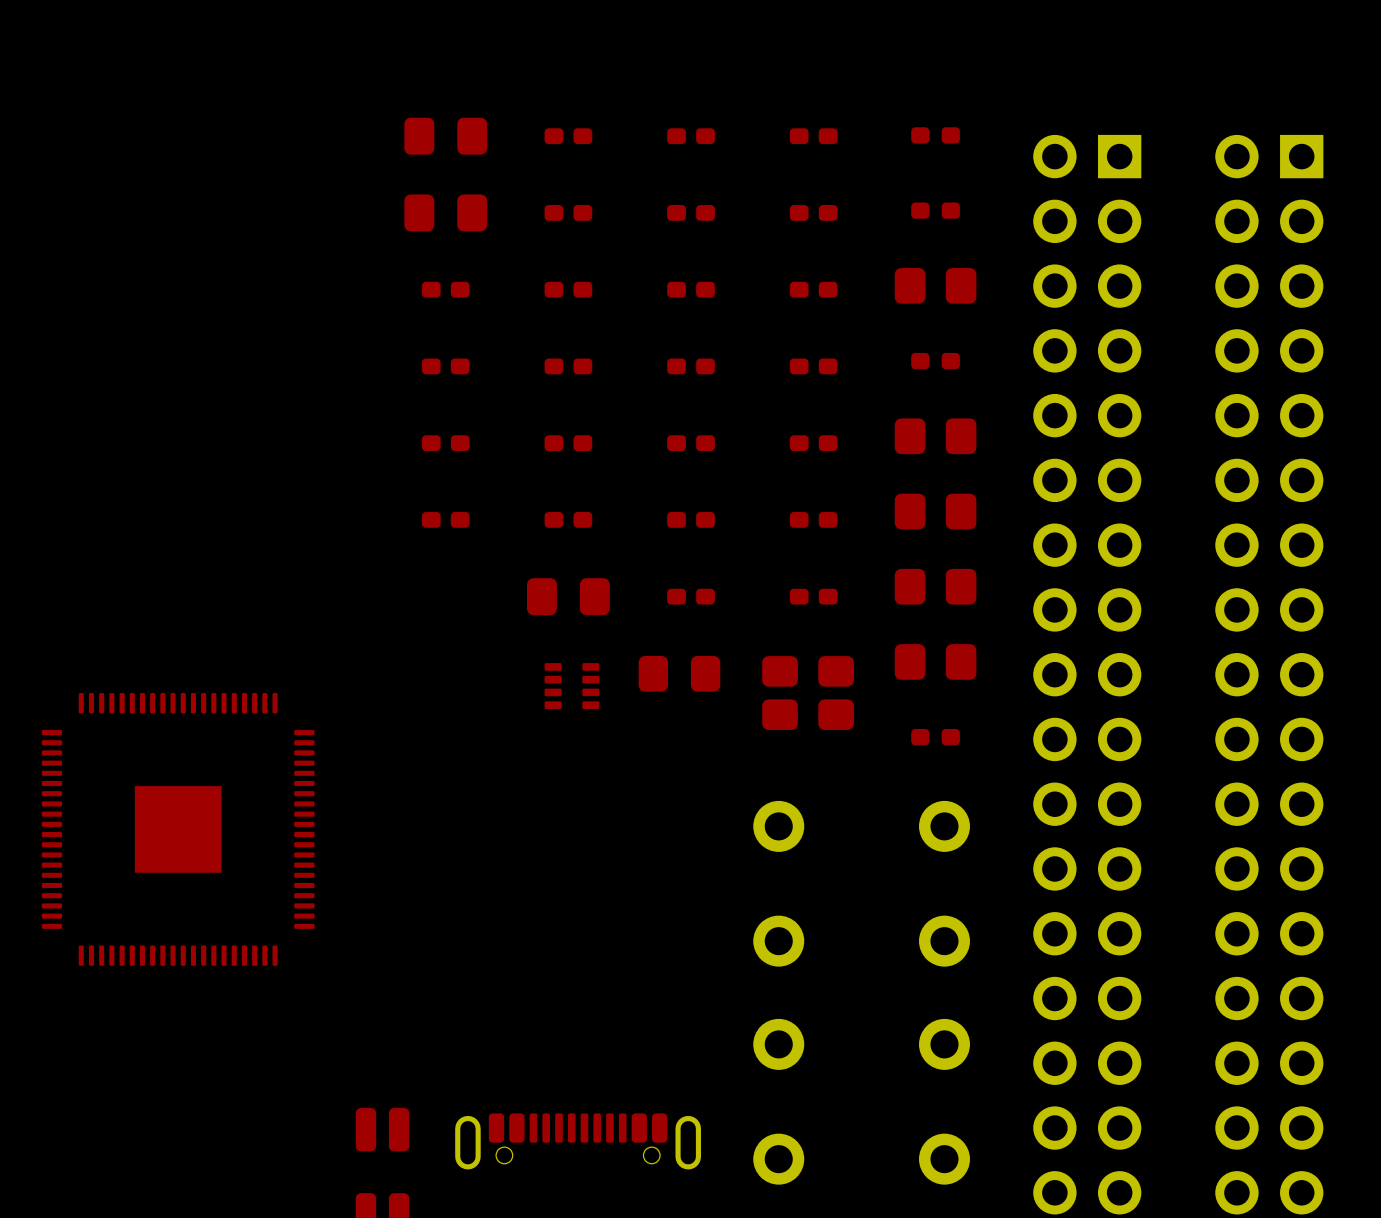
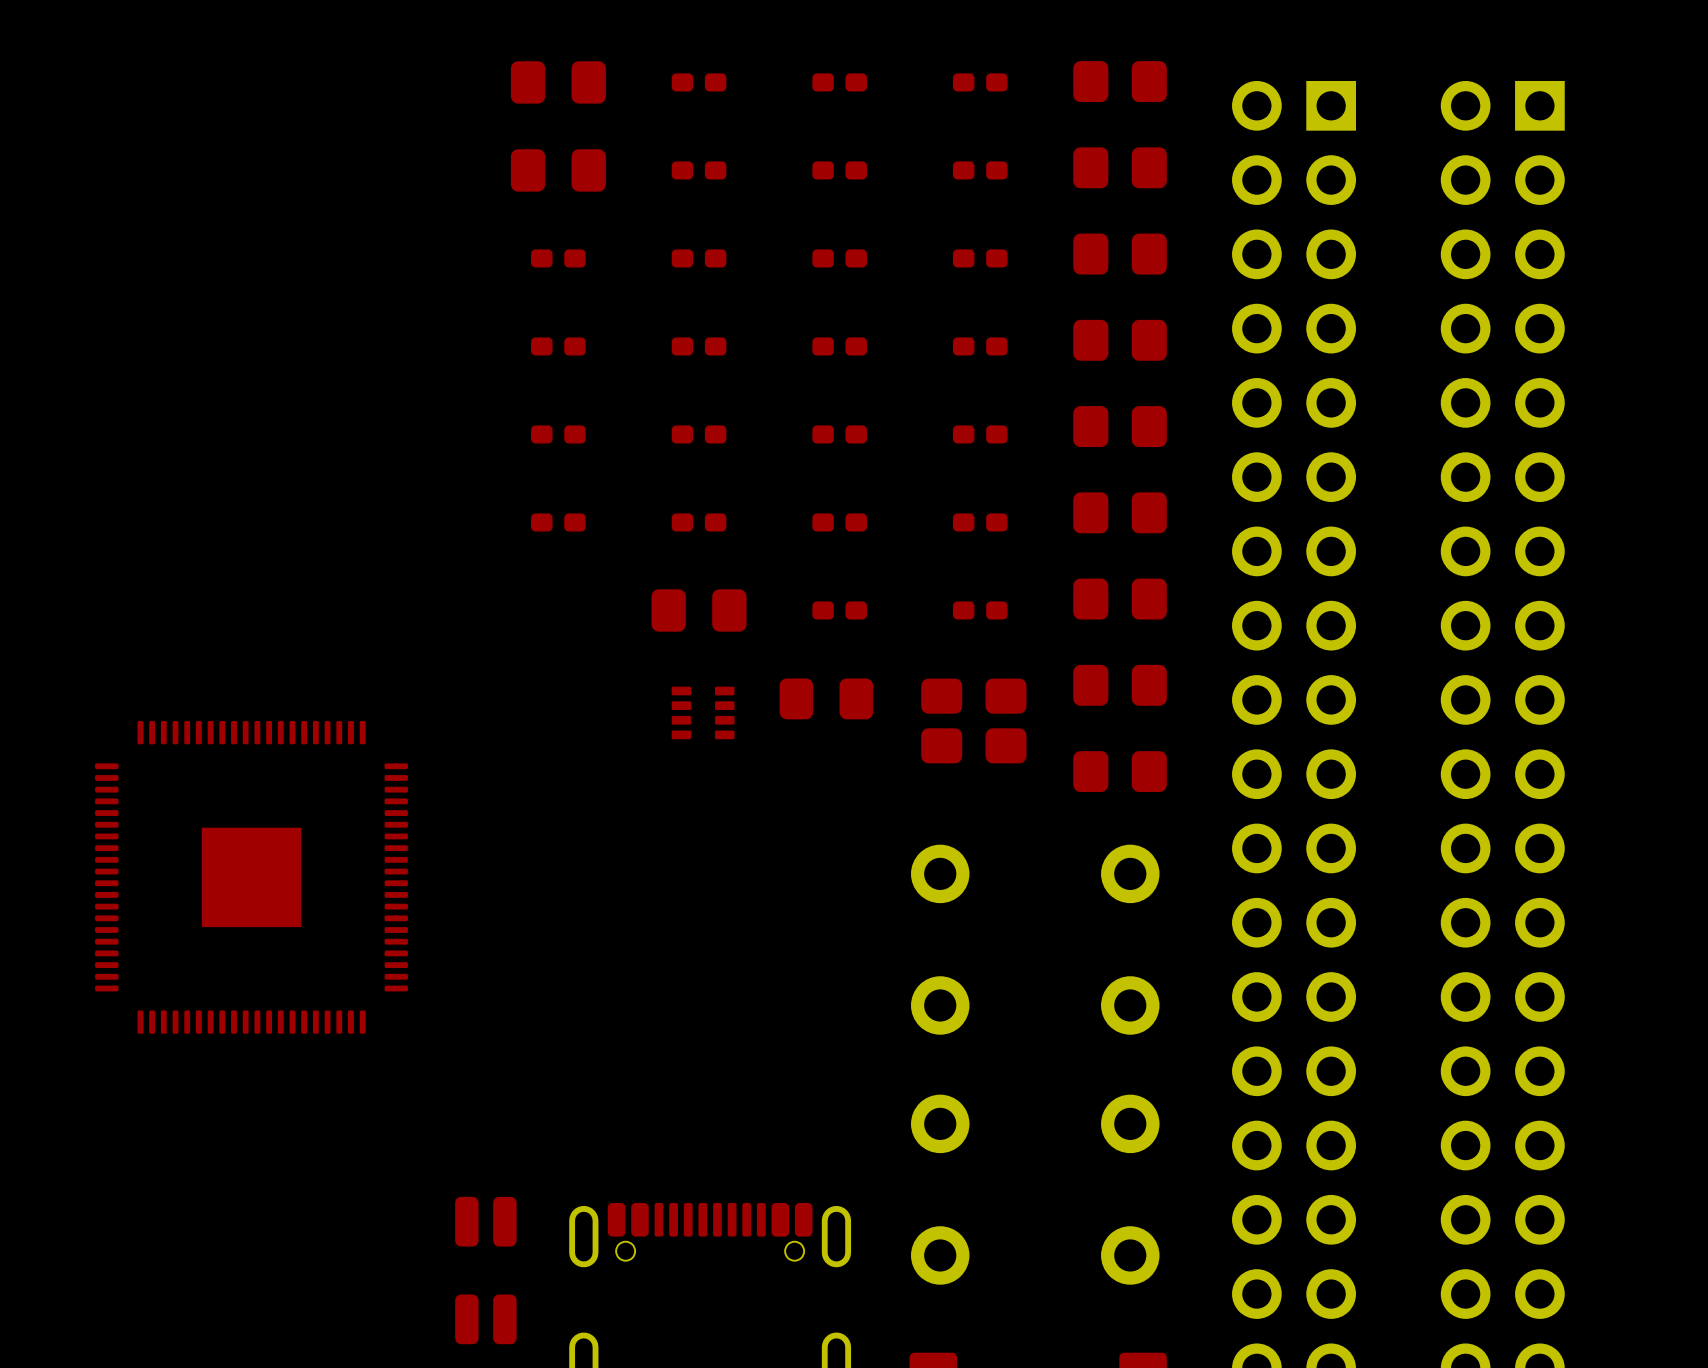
part footprint: [911, 127, 960, 144] -> [1073, 61, 1167, 103]
part footprint: [911, 202, 960, 219] -> [1073, 147, 1167, 189]
part footprint: [911, 352, 960, 370] -> [1073, 319, 1167, 361]
part footprint: [911, 729, 960, 746] -> [1073, 751, 1167, 793]

